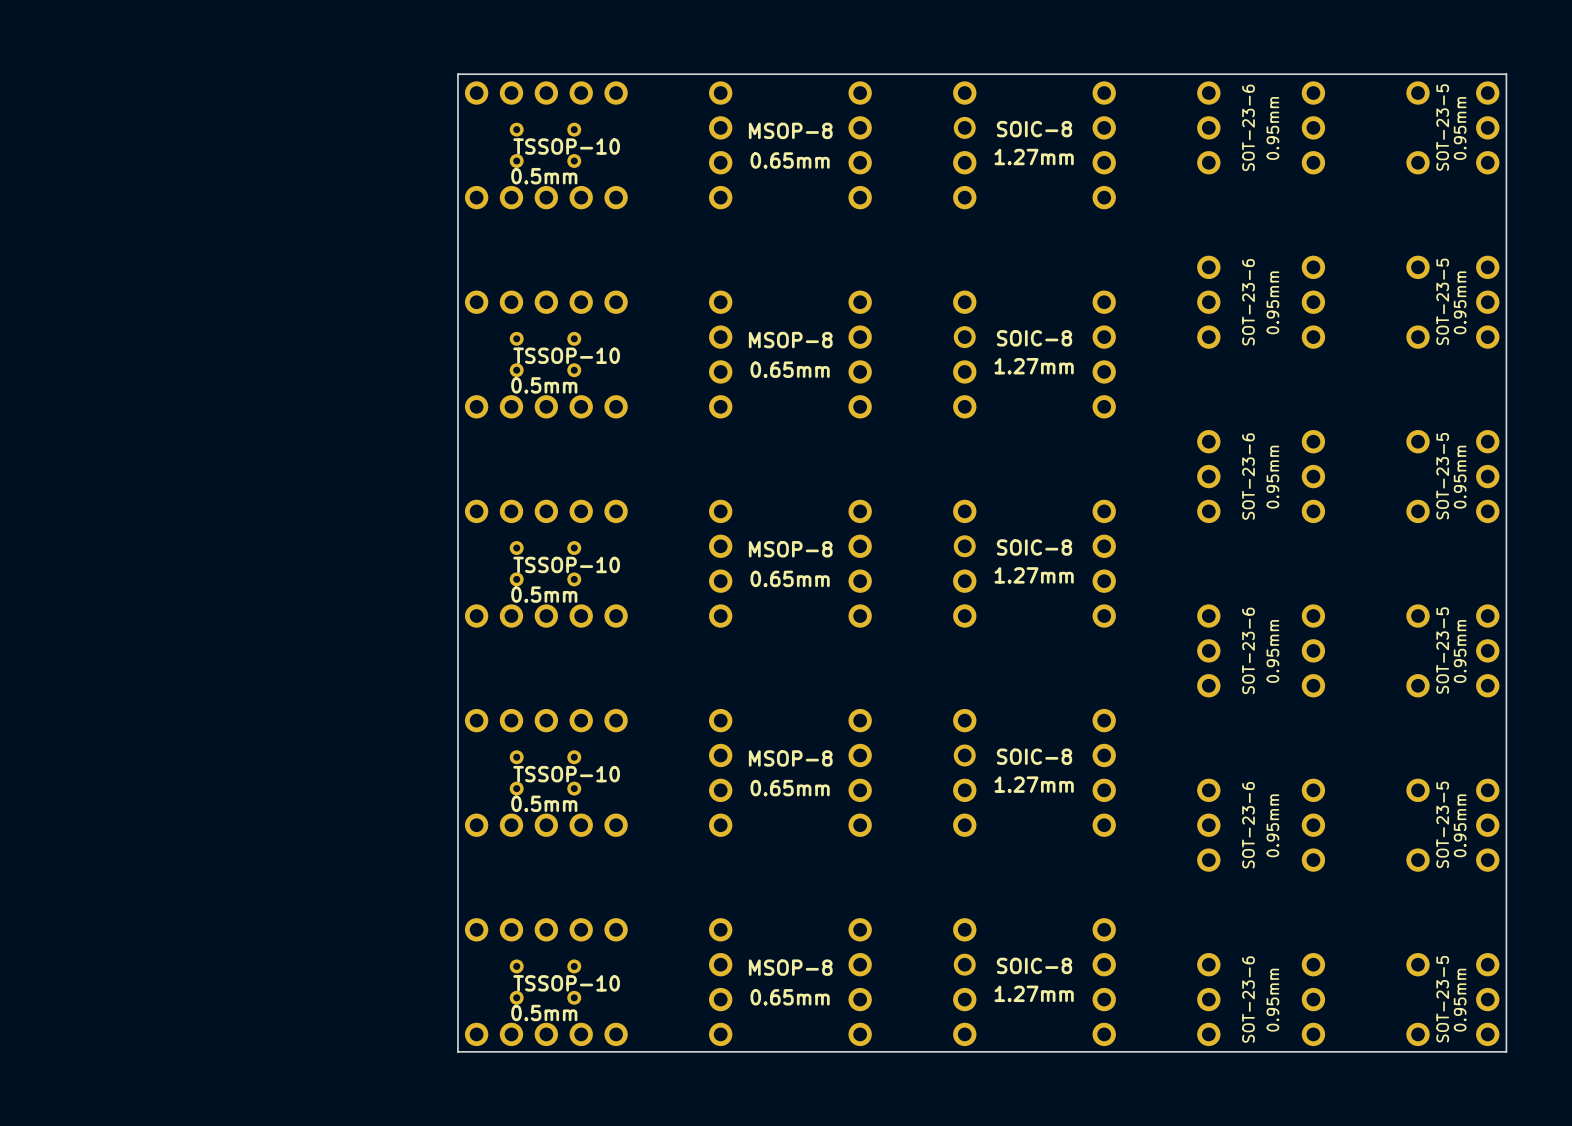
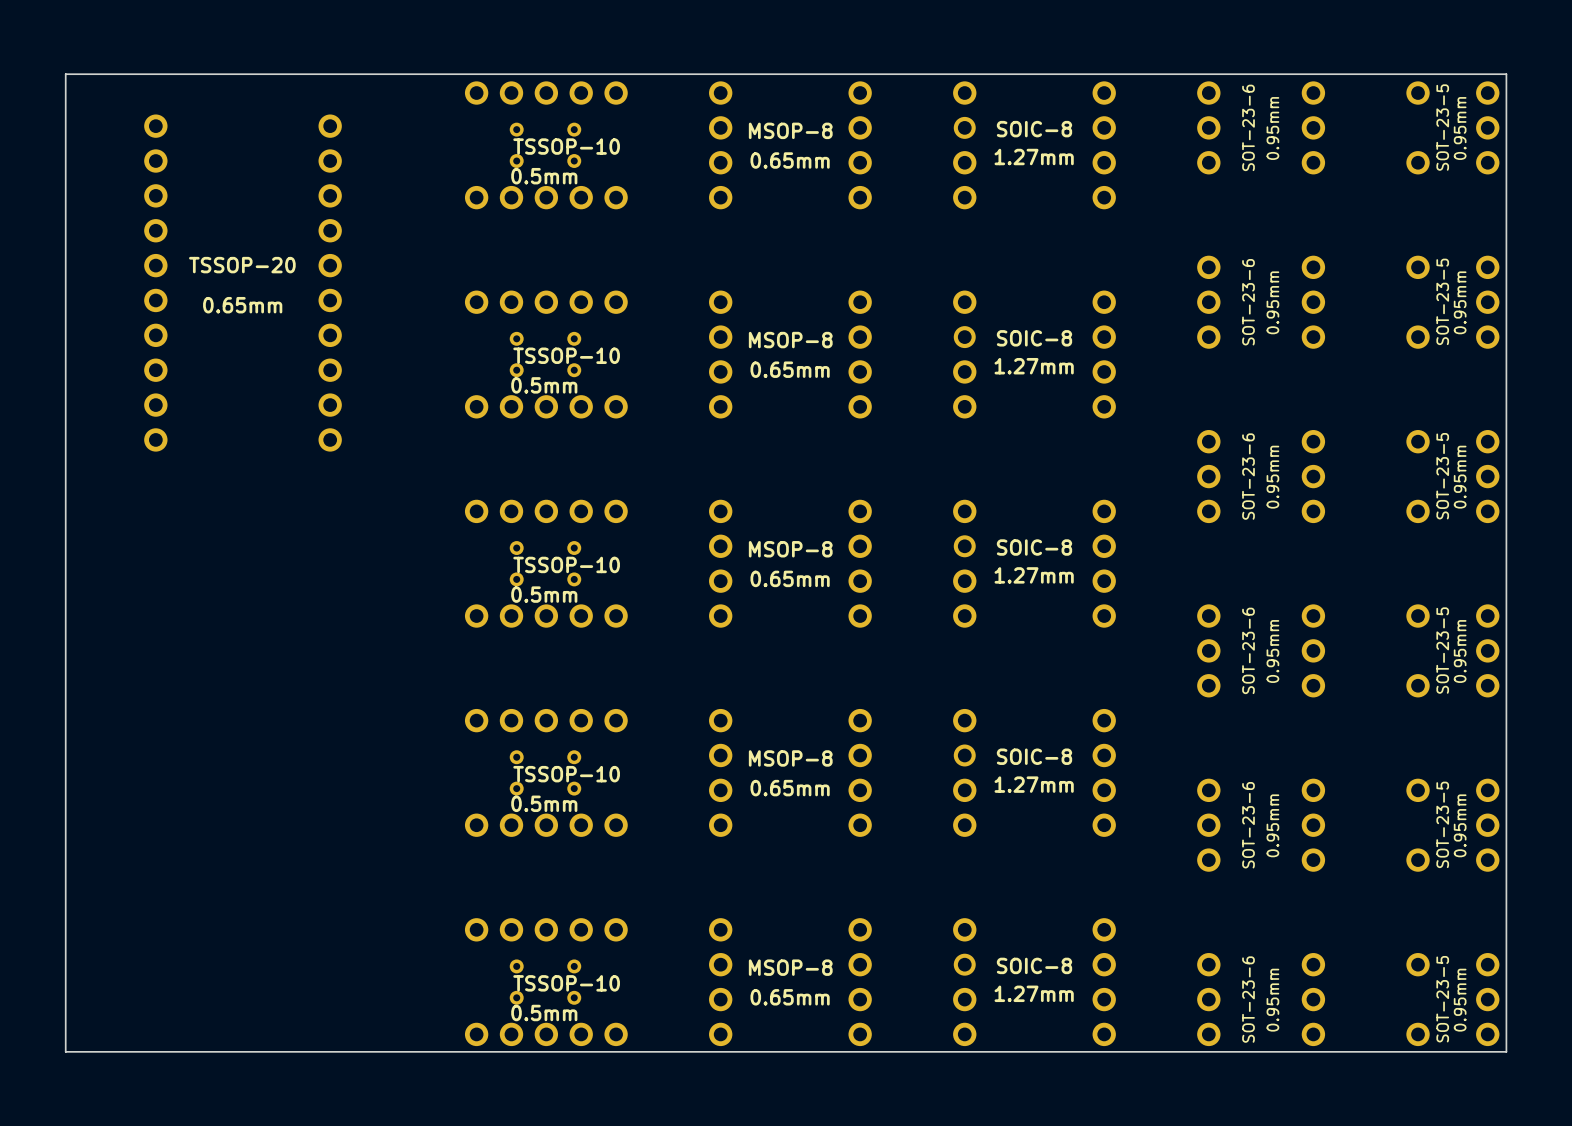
board edge: (457, 74) (457, 1051) -> (457, 74) (65, 74) (65, 1051) (457, 1051)
part: none -> (243, 283)

